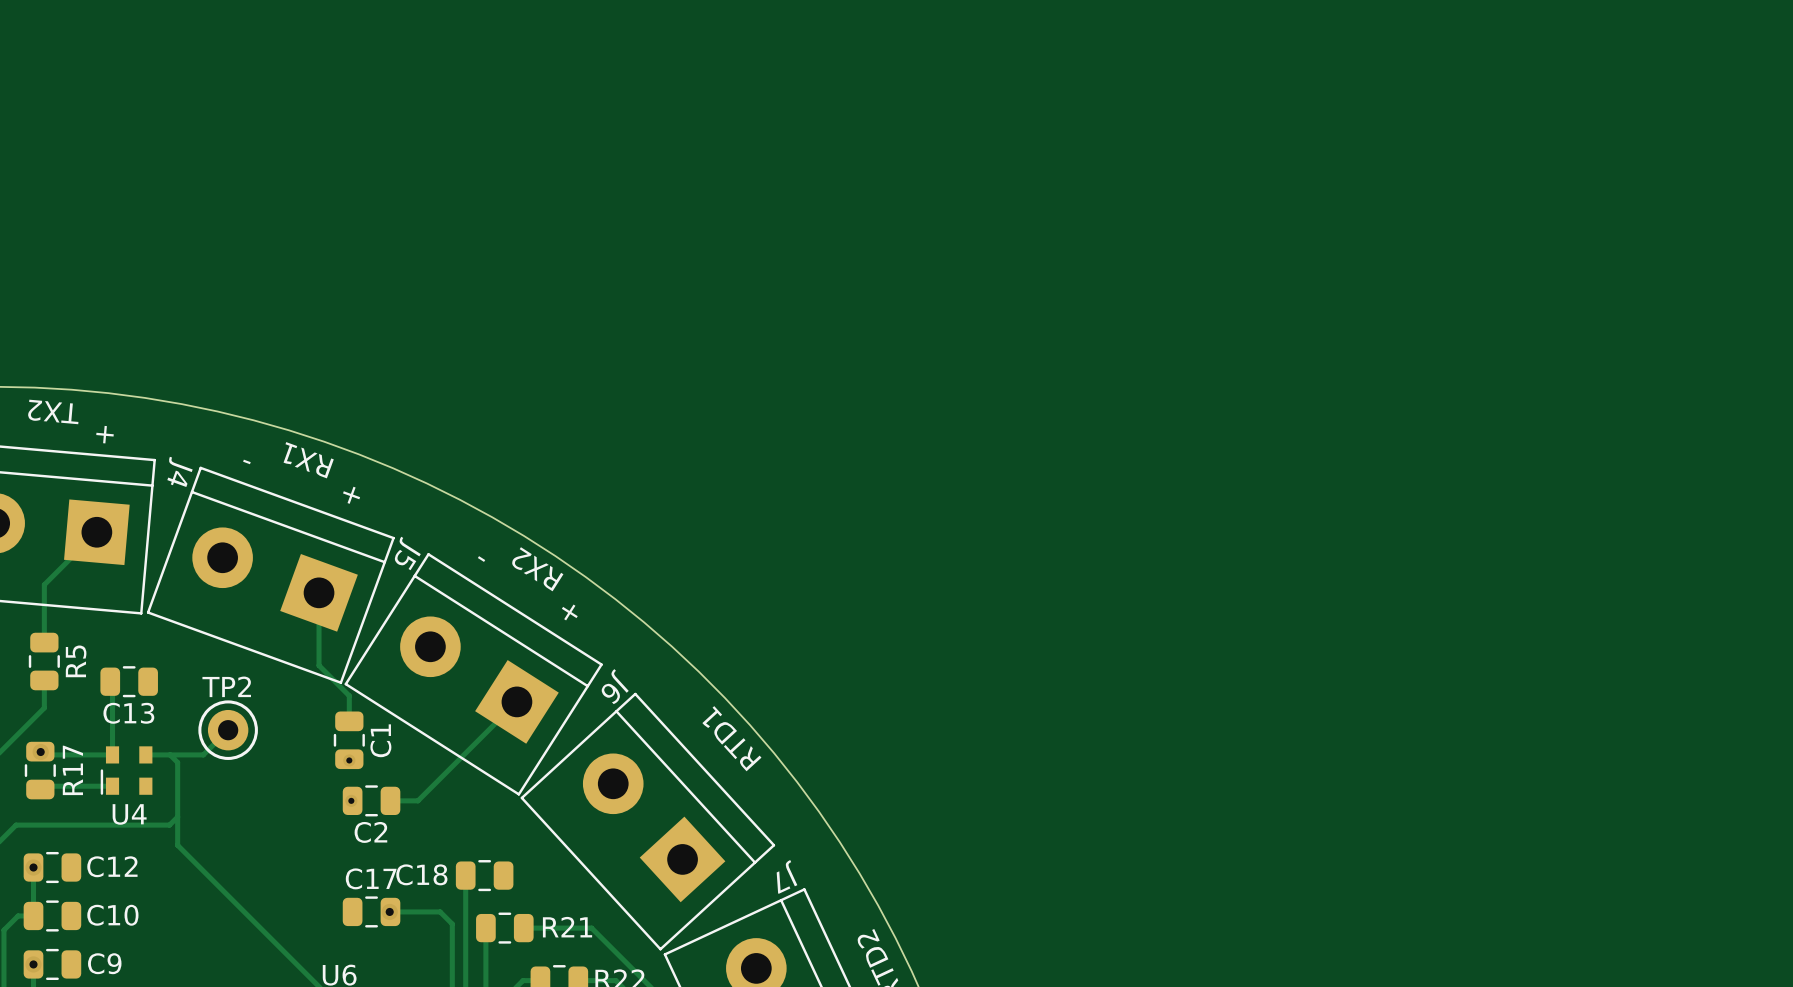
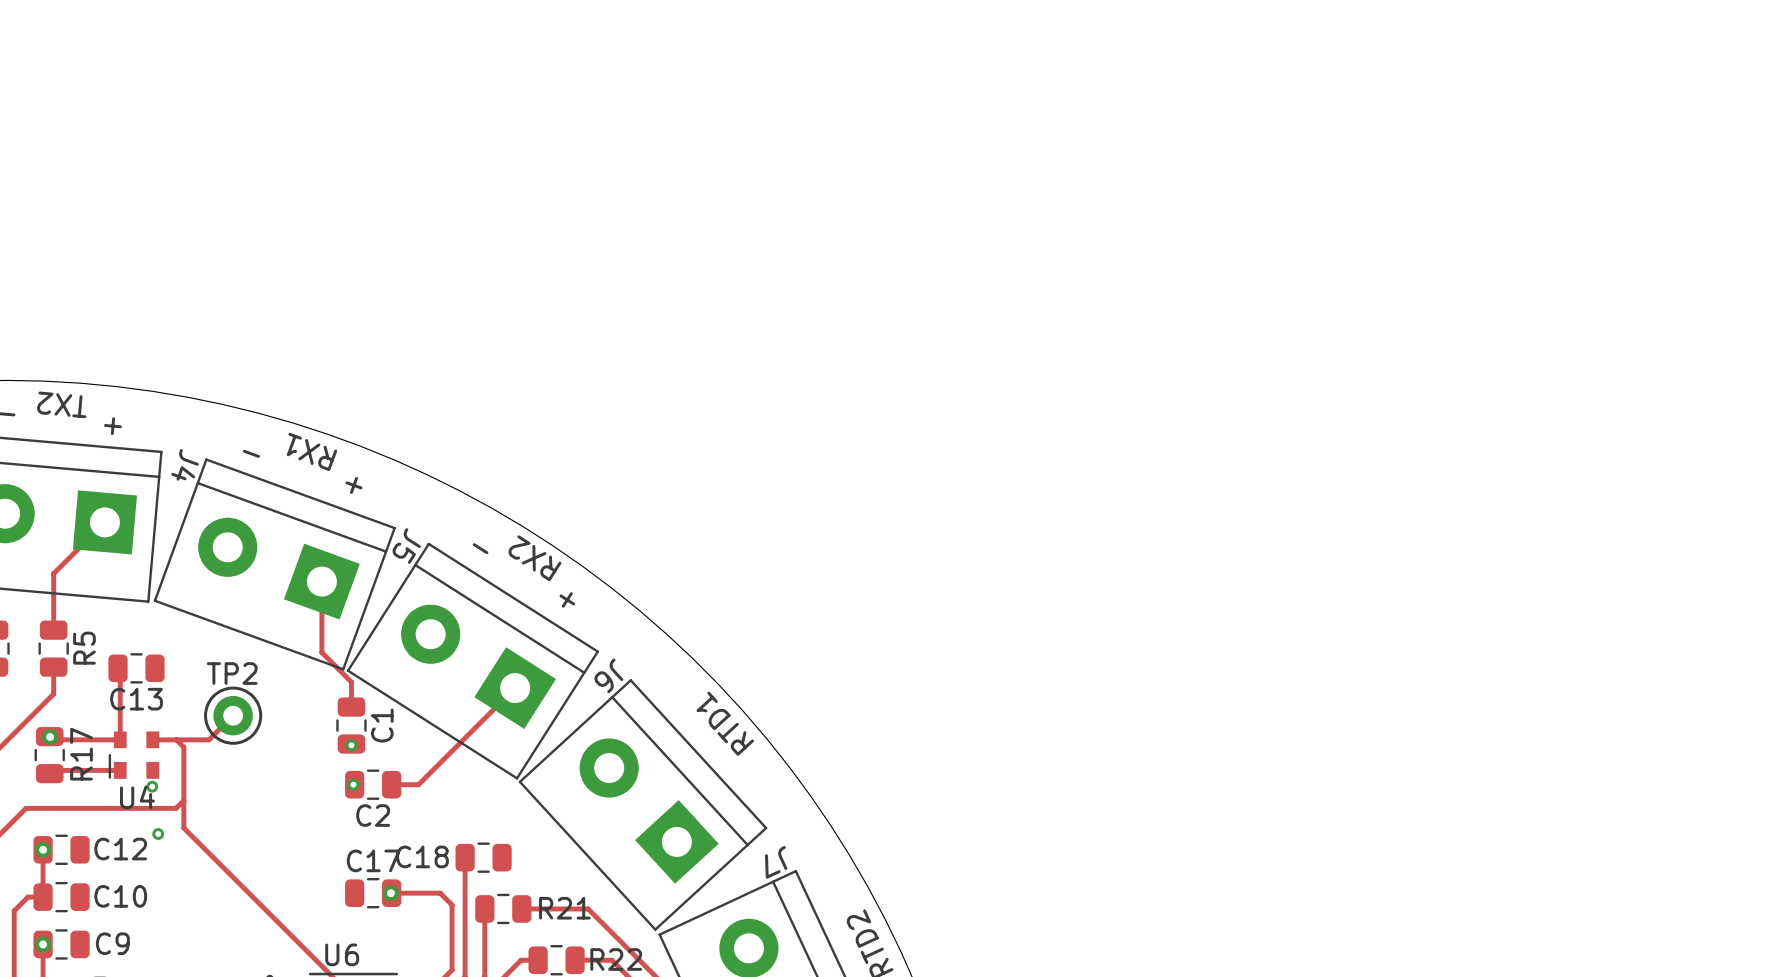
via: none -> (152, 786)
via: none -> (158, 834)

